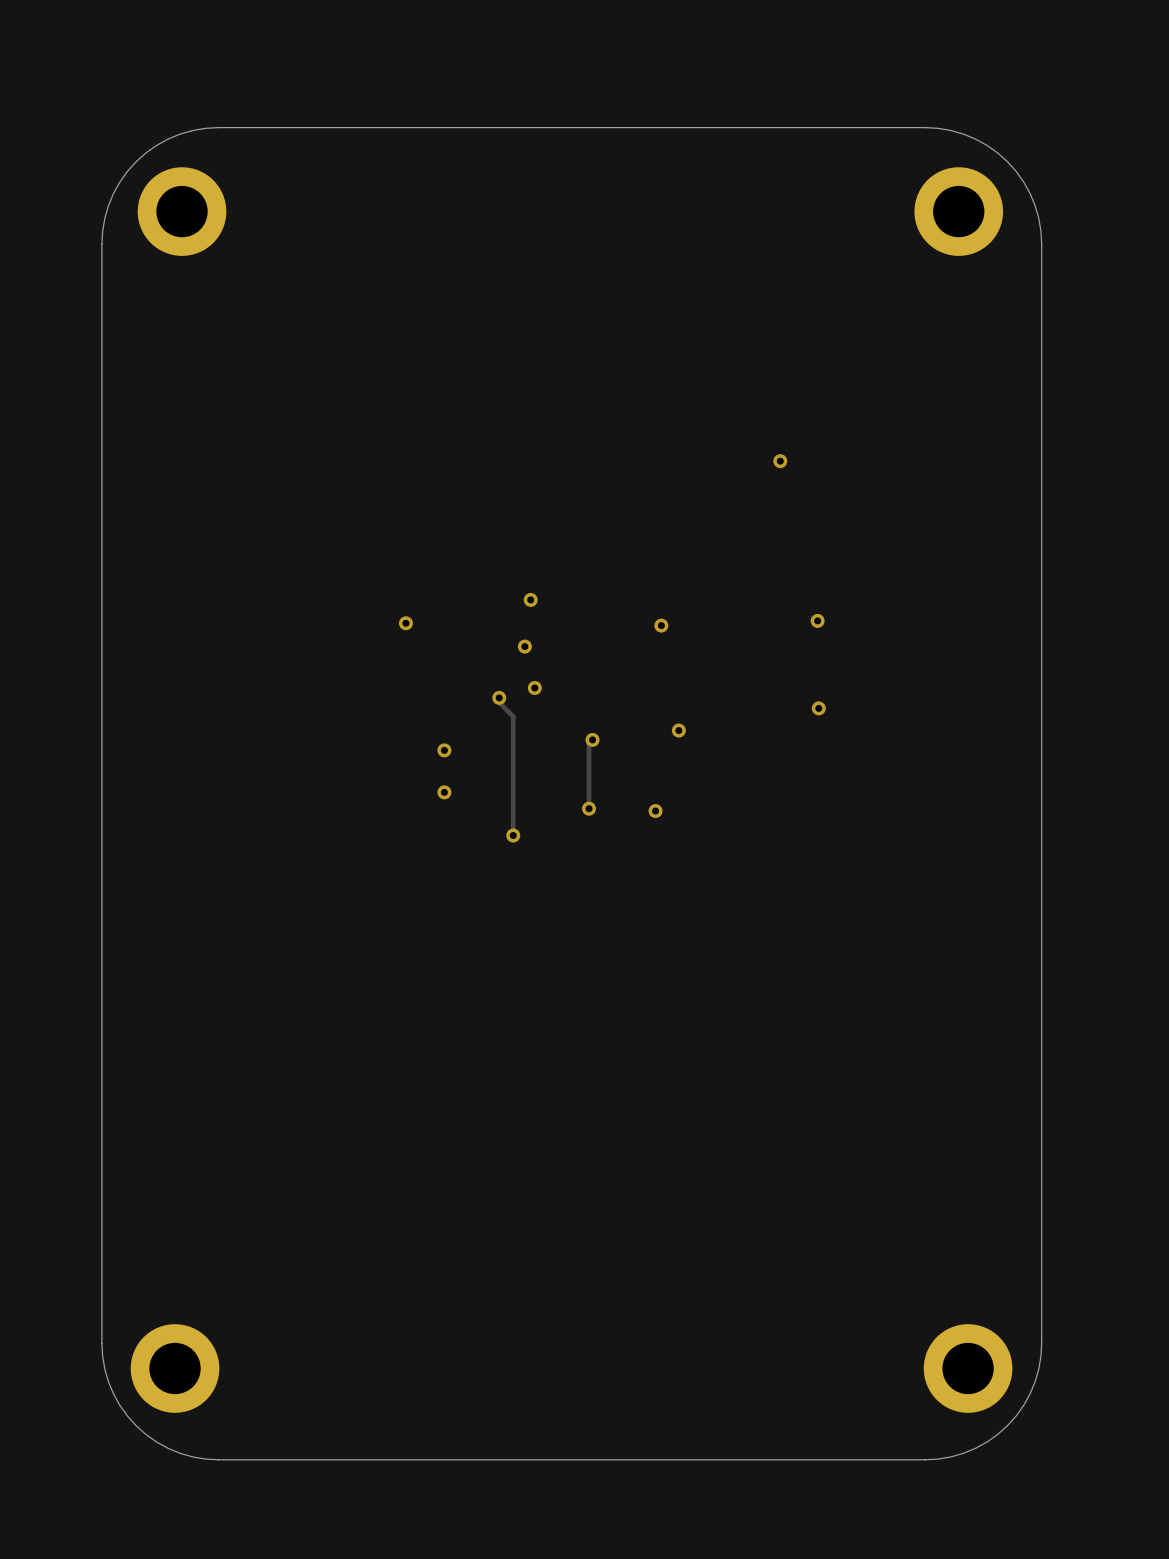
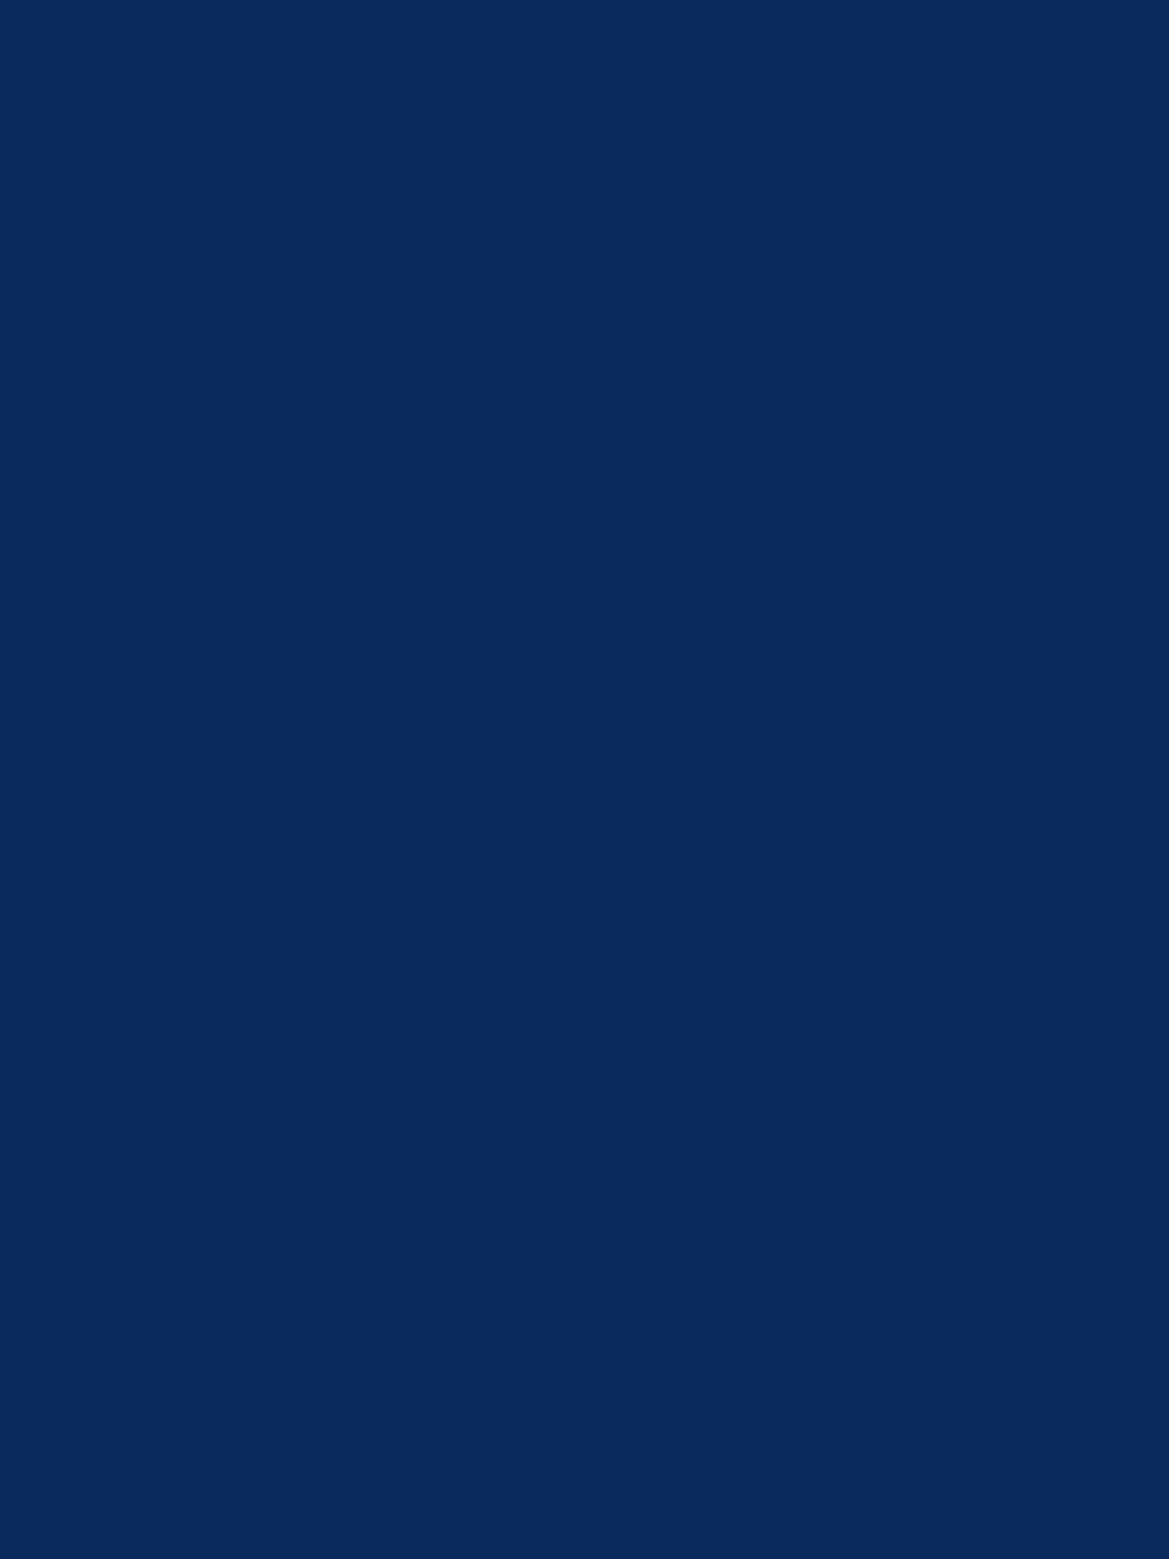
board edge: (925, 127) (205, 128) (180, 134) (156, 145) (136, 161) (119, 182) (104, 218) (101, 244) (101, 1343) (104, 1369) (113, 1393) (127, 1415) (156, 1441) (192, 1456) (218, 1459) (925, 1459) (951, 1456) (975, 1448) (1007, 1425) (1023, 1405) (1038, 1369) (1041, 1343) (1040, 231) (1030, 193) (1016, 171) (997, 153) (963, 134) (925, 127) -> none
part: (182, 211) -> none
part: (958, 211) -> none
via: (780, 461) -> none
via: (530, 599) -> none
via: (817, 620) -> none
via: (405, 623) -> none
via: (661, 625) -> none
via: (524, 646) -> none
via: (534, 687) -> none
track: (499, 697) (499, 702) (513, 716) (513, 835) -> none
via: (499, 697) -> none
via: (818, 708) -> none
via: (678, 730) -> none
track: (592, 739) (589, 743) (589, 808) -> none
via: (592, 739) -> none
via: (444, 750) -> none
via: (444, 792) -> none
via: (589, 808) -> none
via: (655, 811) -> none
via: (513, 835) -> none
part: (175, 1368) -> none
part: (968, 1368) -> none

